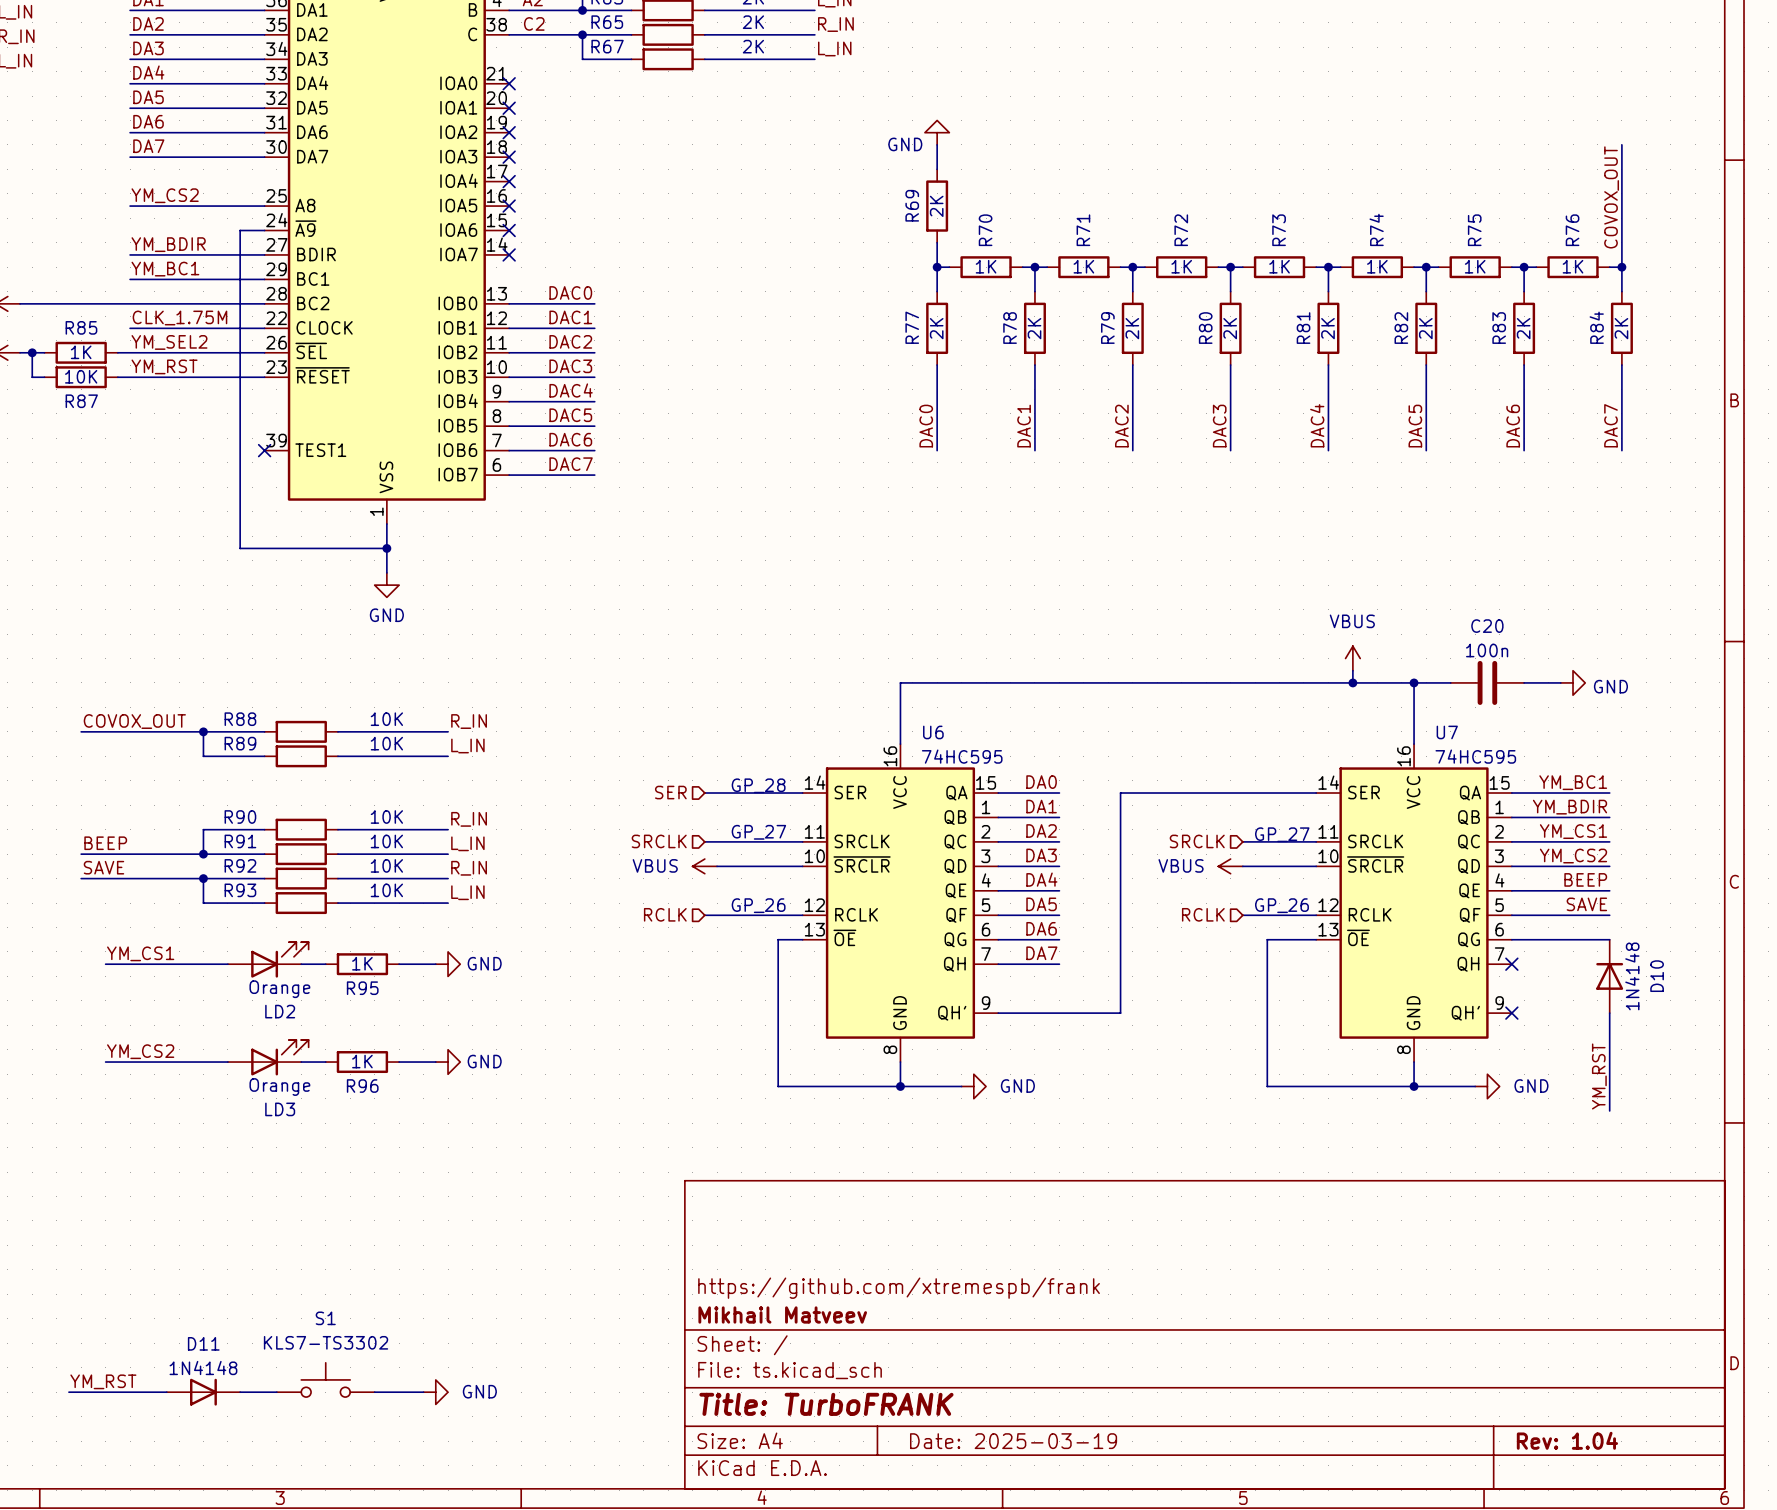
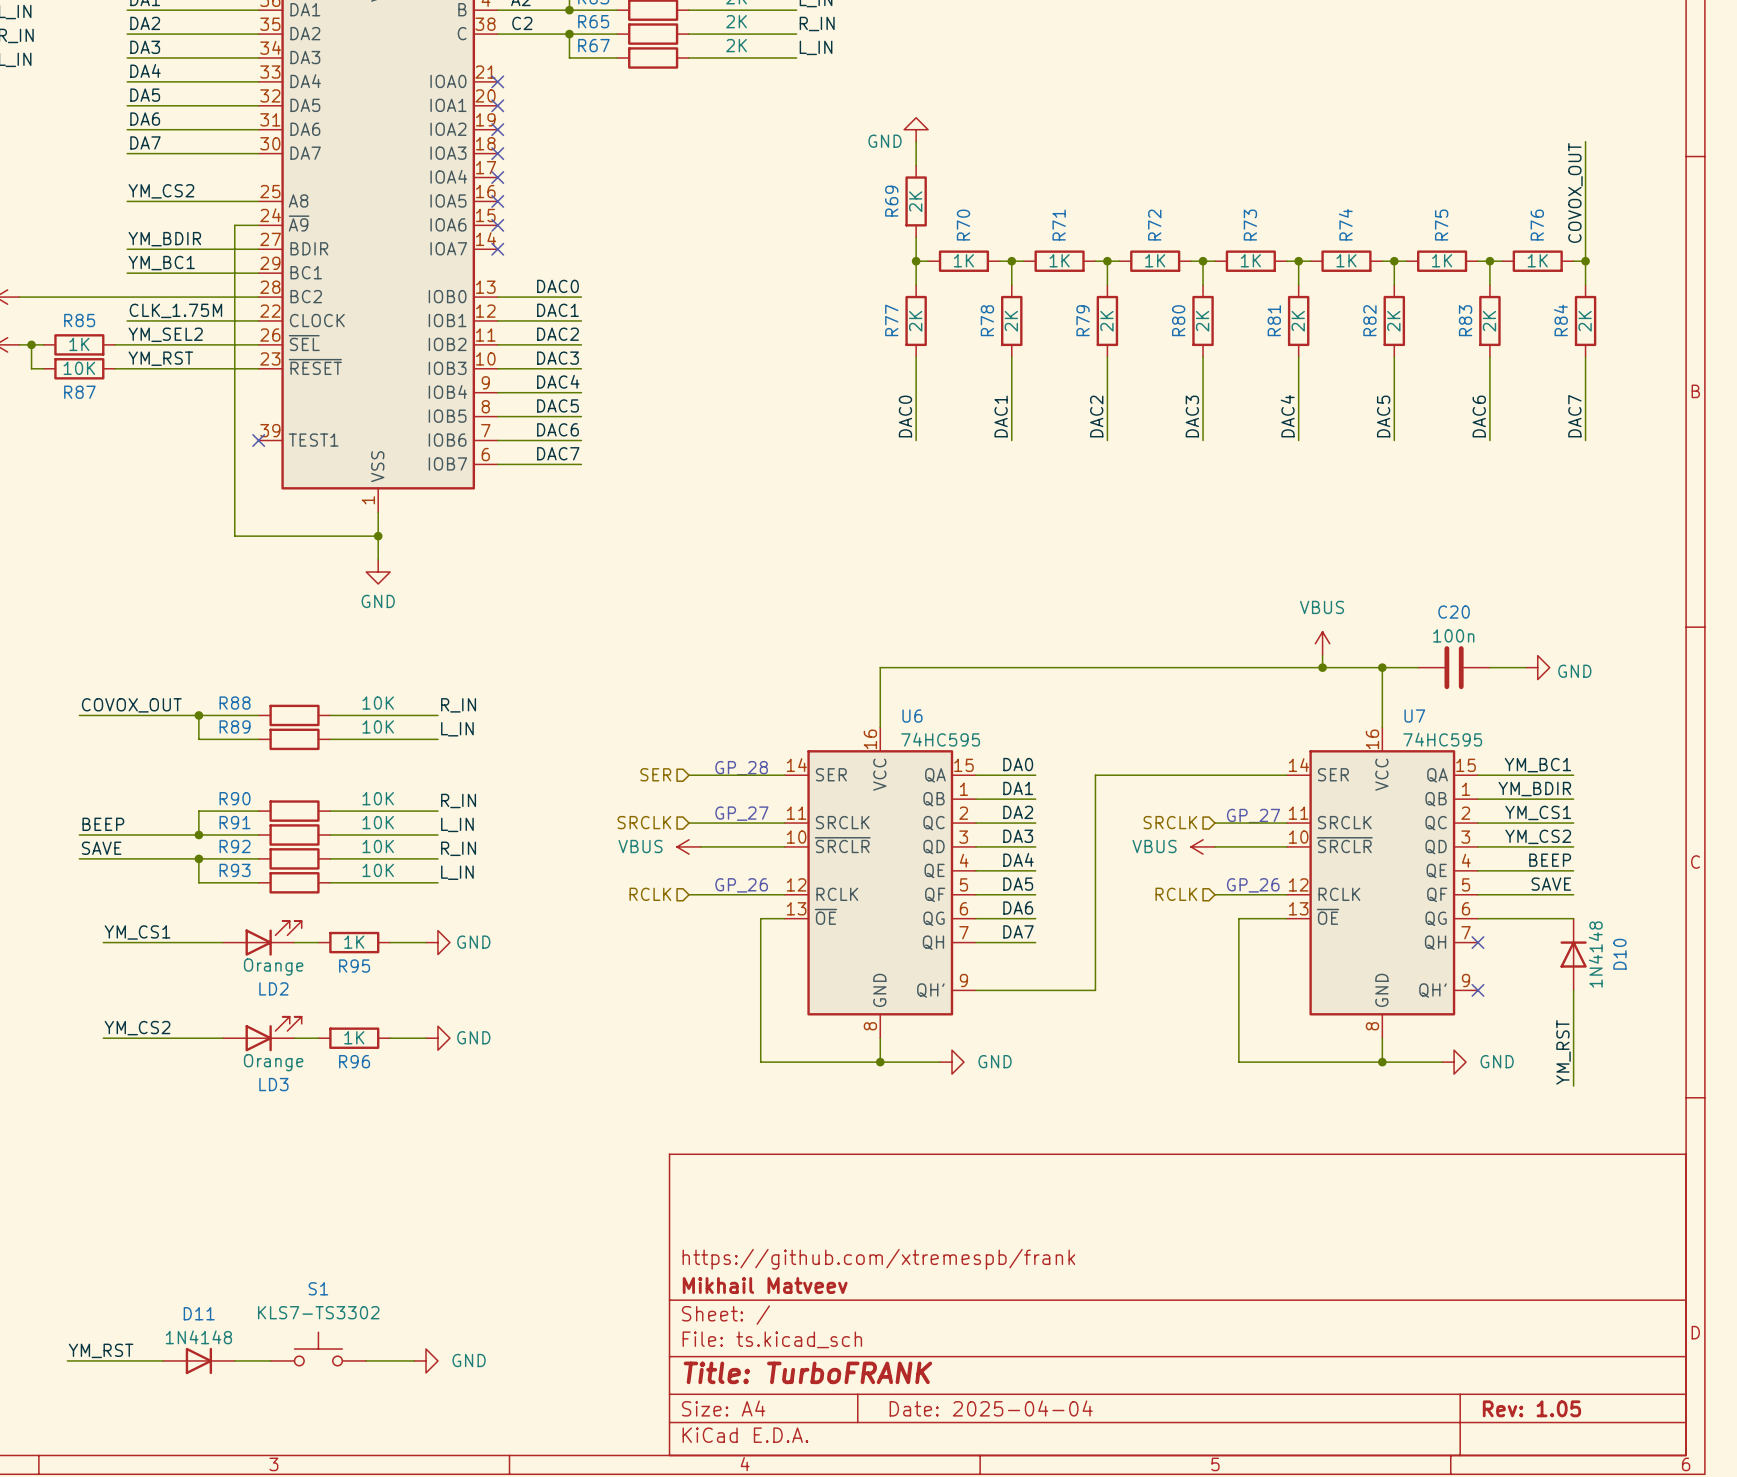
title block: Rev: 1.04 (1567, 1440) -> Rev: 1.05 (1531, 1408)
title block: Date: 2025-03-19 (1013, 1441) -> Date: 2025-04-04 (991, 1408)

